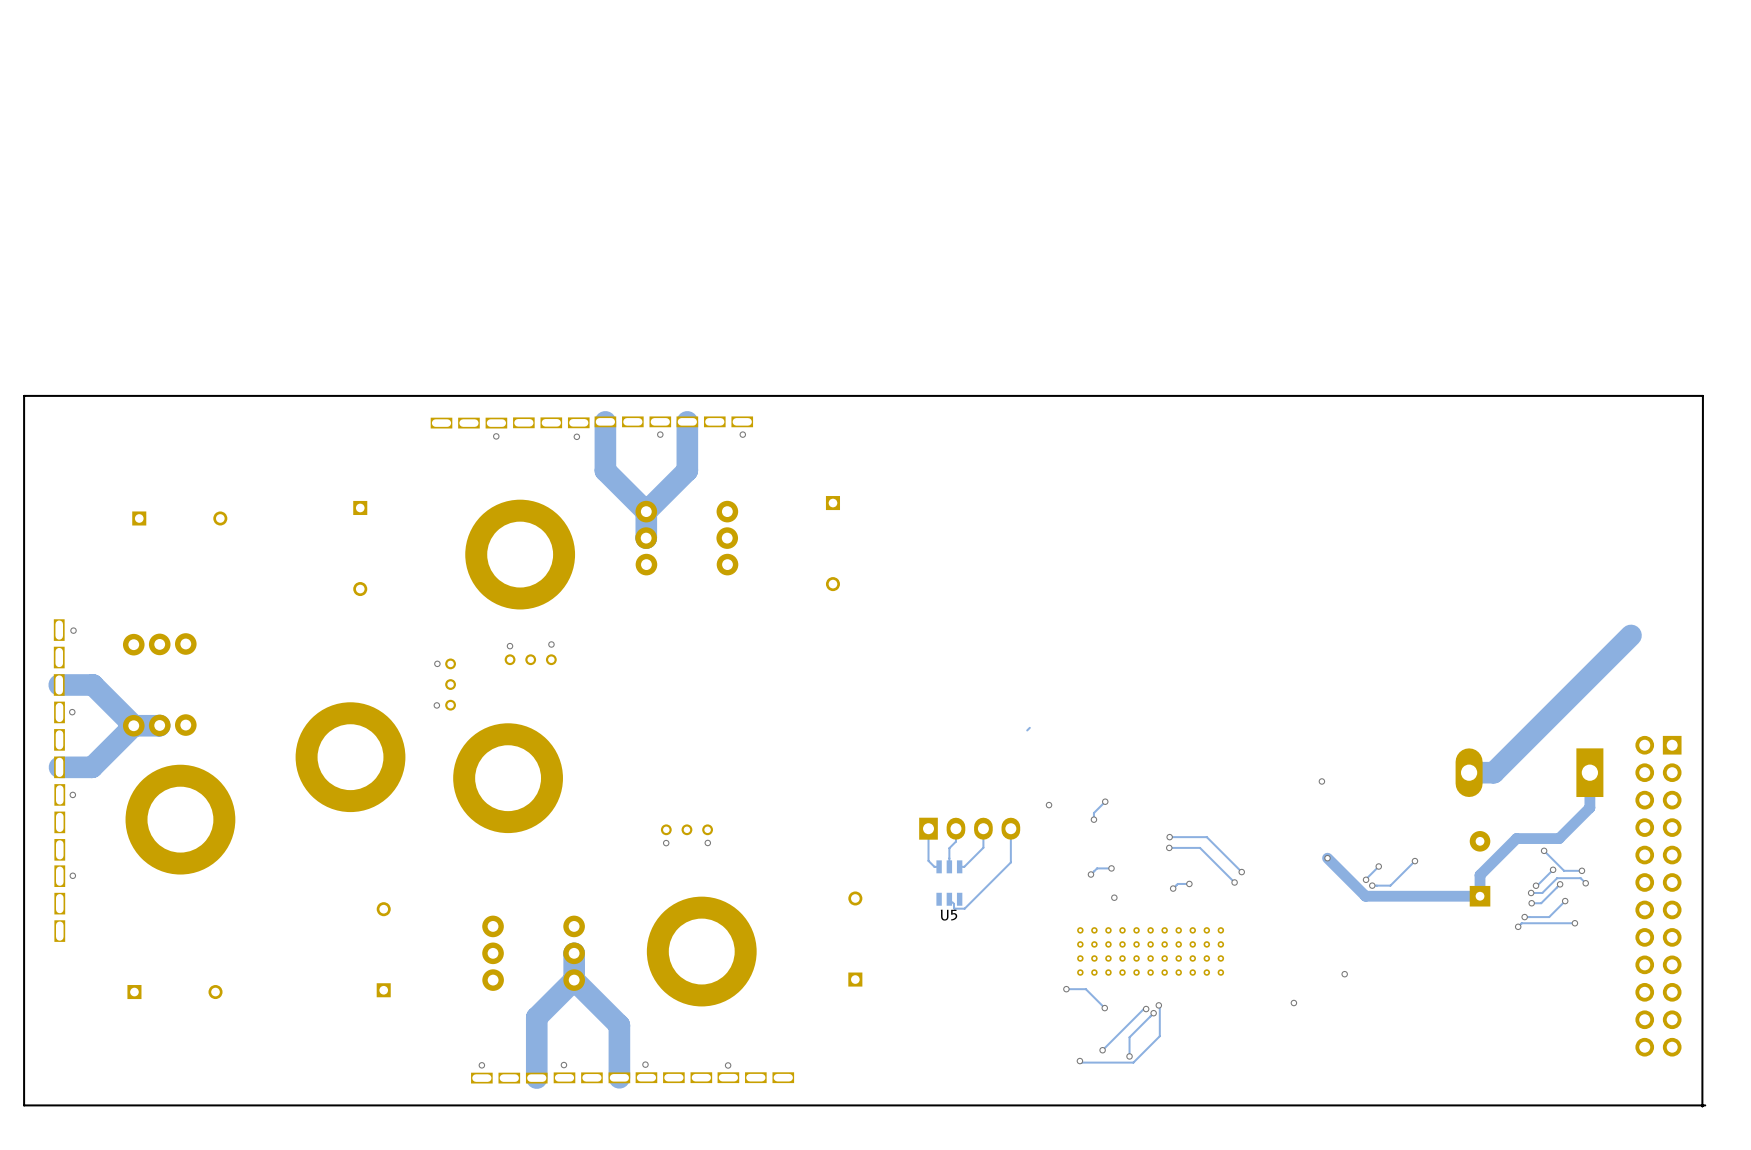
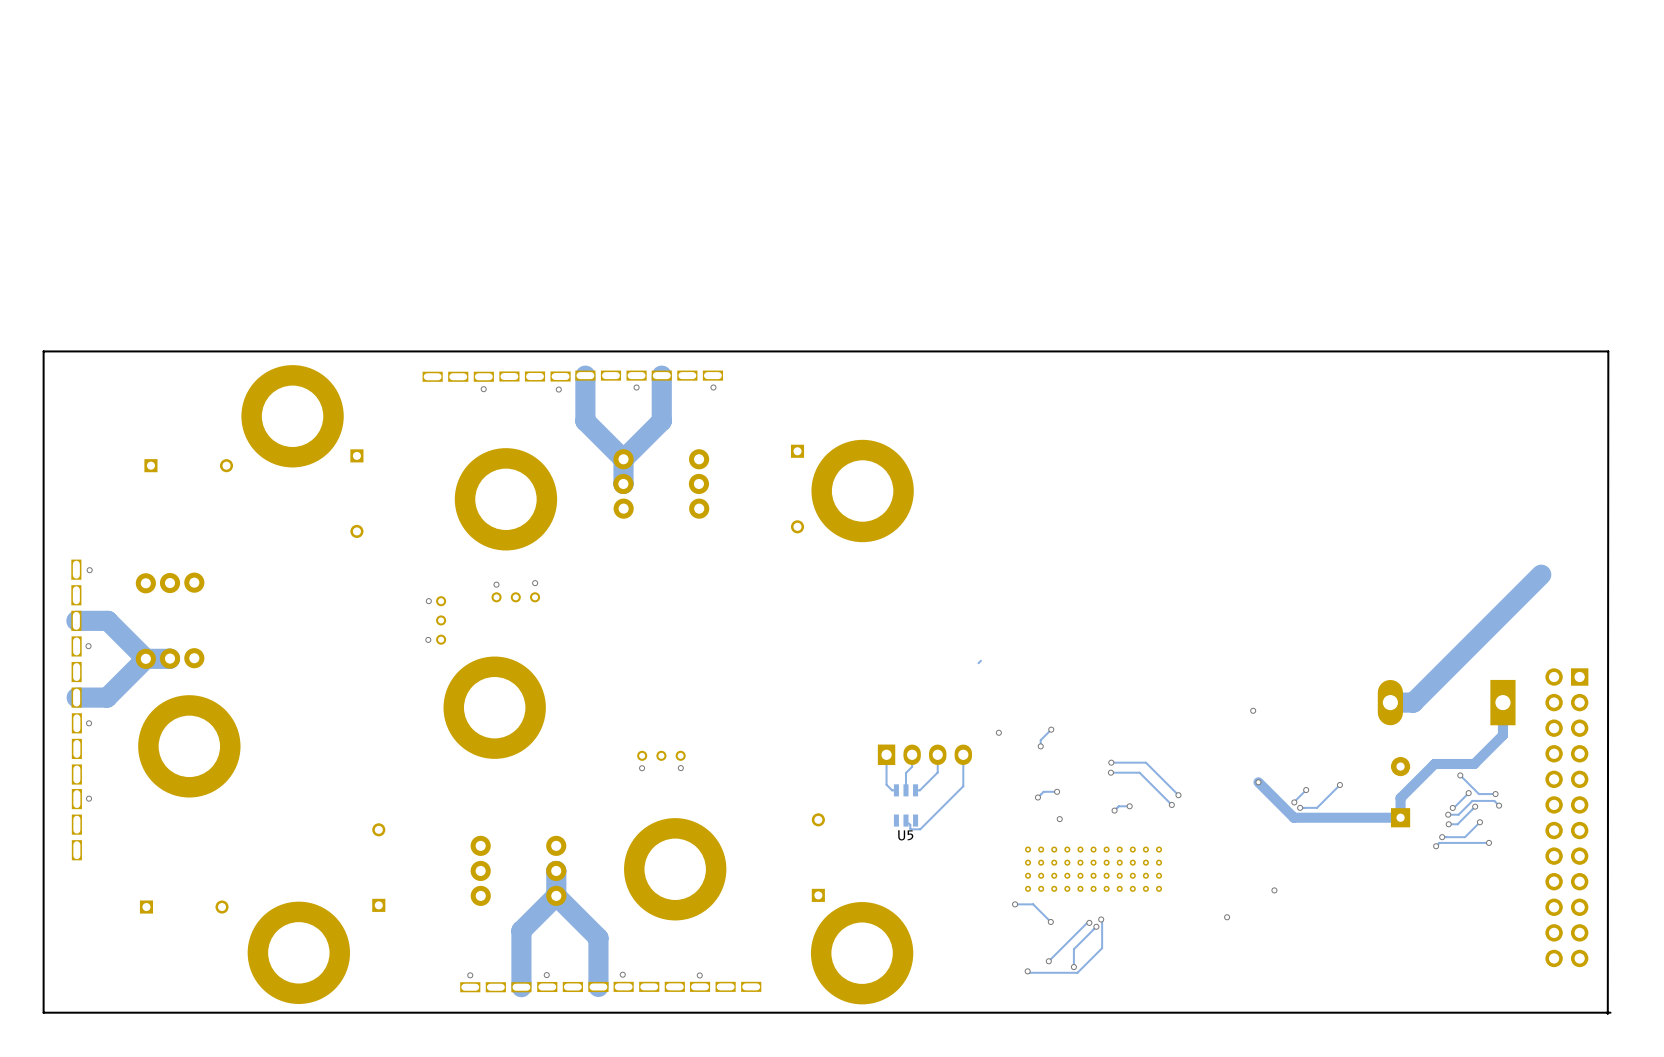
part: none -> (292, 416)
part: none -> (862, 491)
part: (350, 757) -> none
part: none -> (298, 952)
part: none -> (862, 953)

